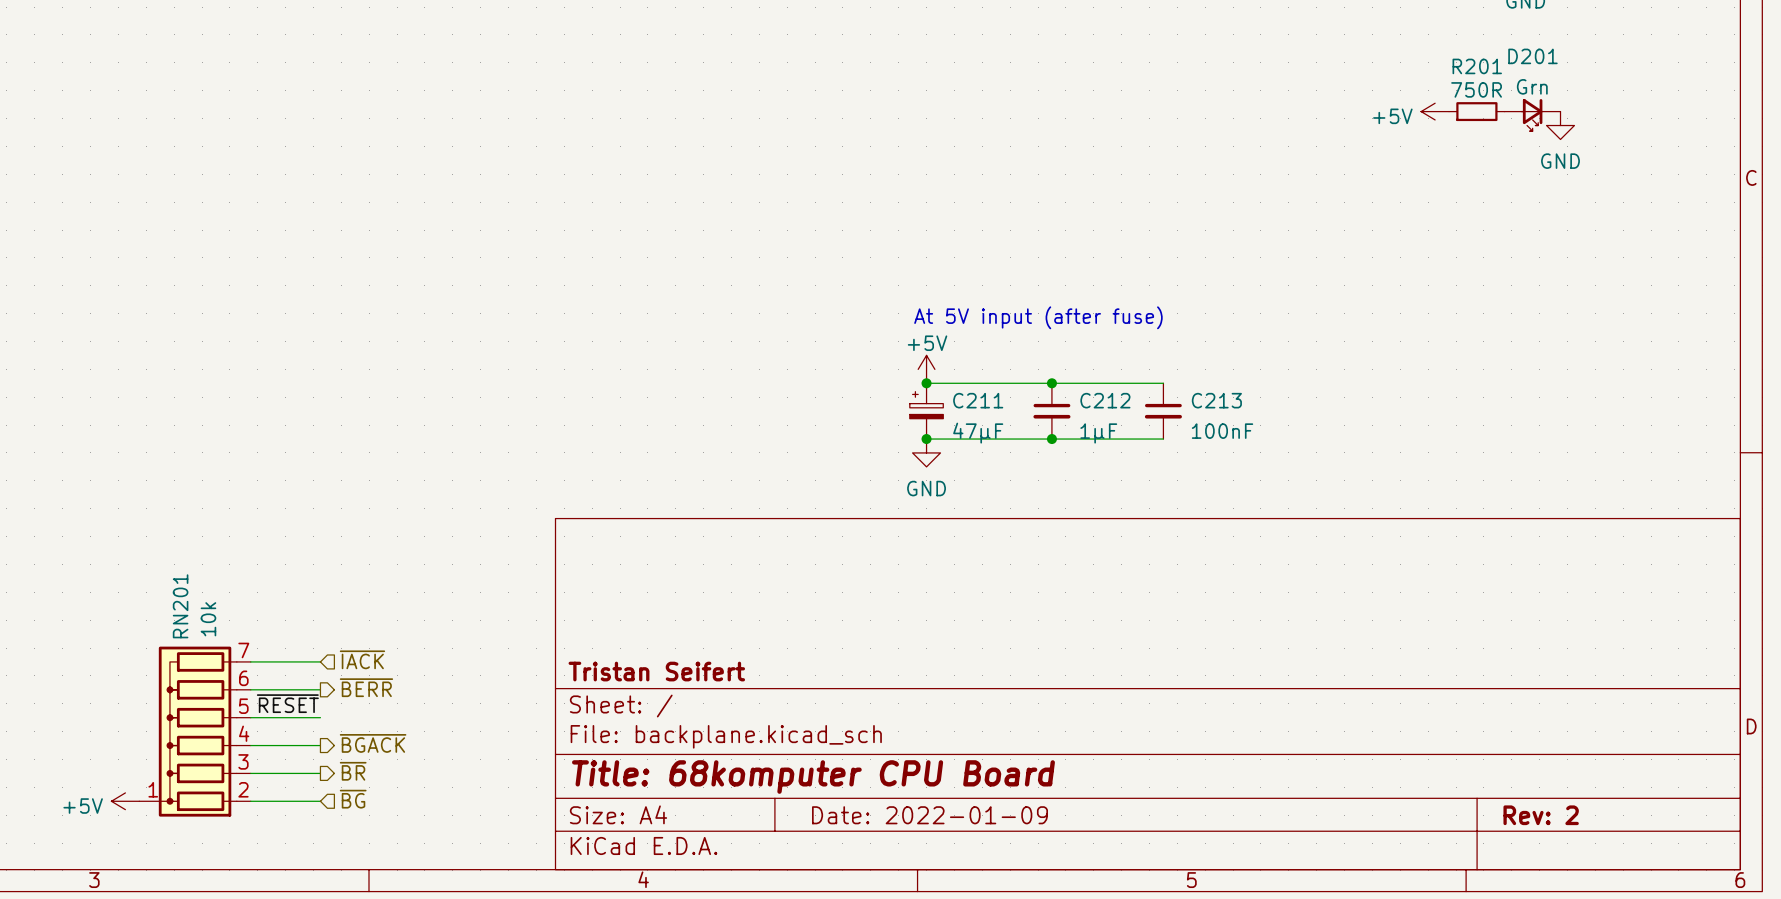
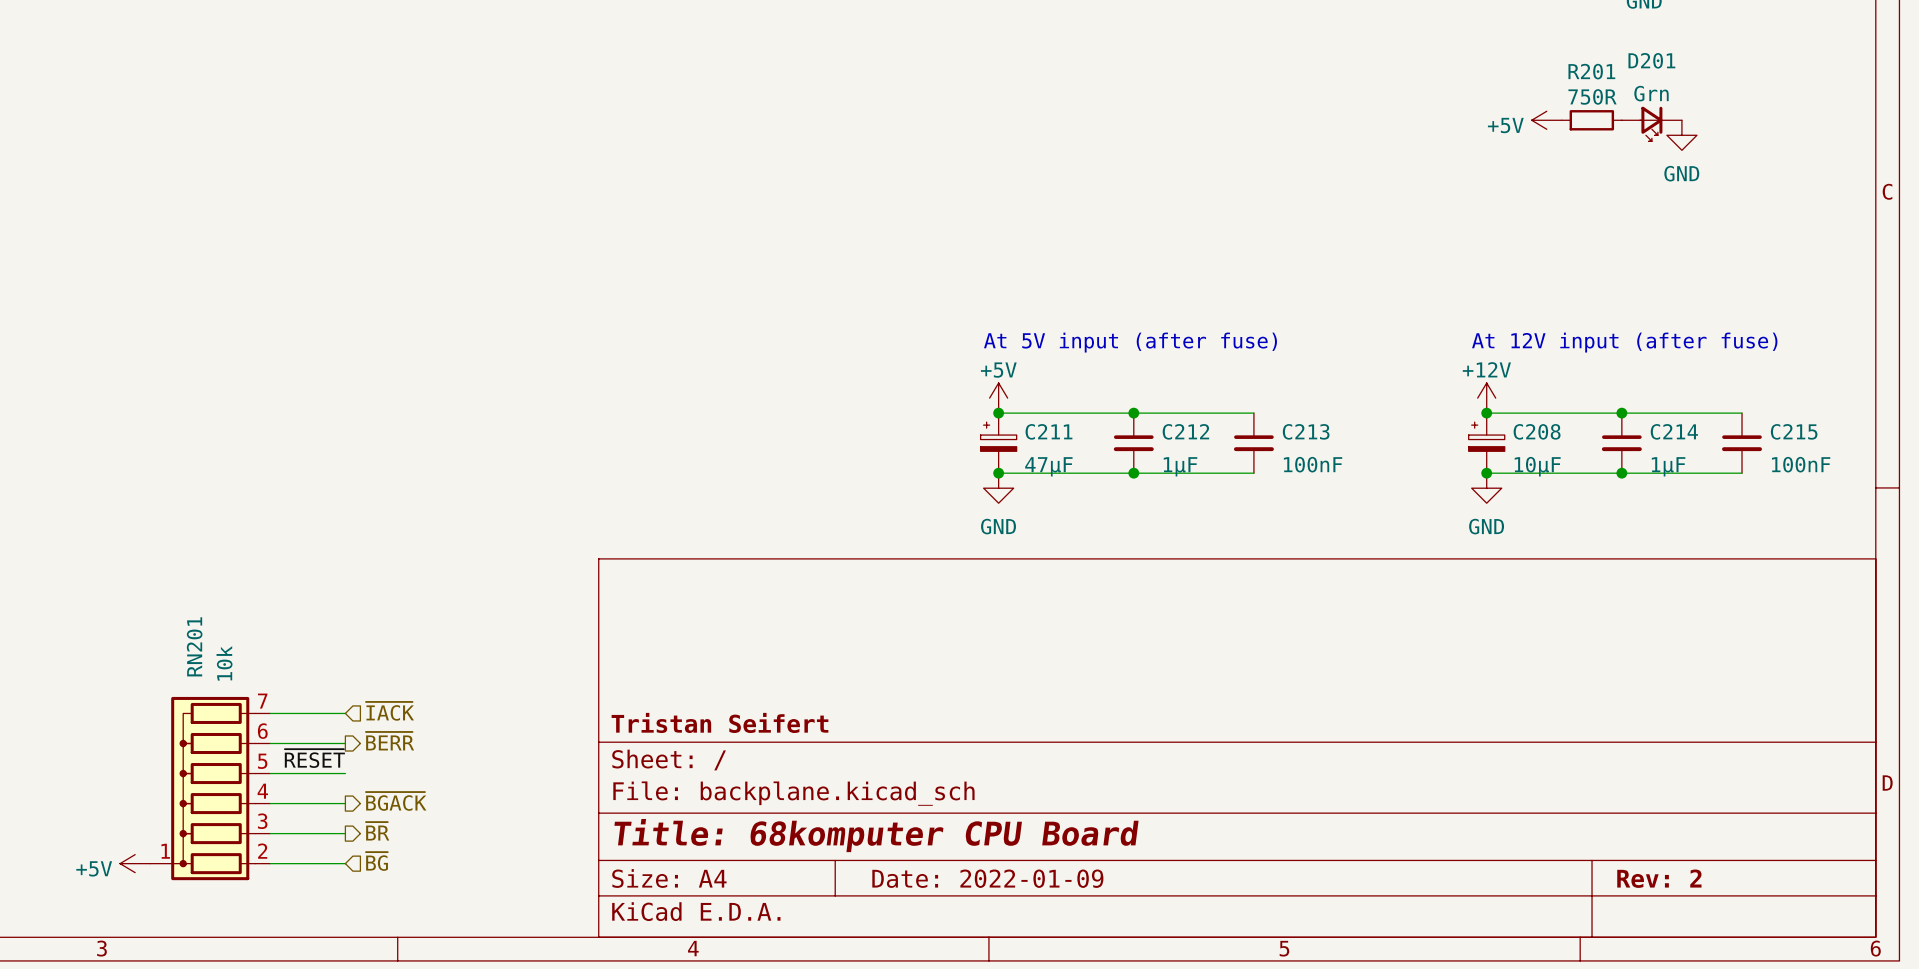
text: none -> At 12V input (after fuse) (1624, 342)
power symbol: none -> +12V (1486, 398)
wire: none -> (1486, 413) (1742, 413)
junction: none -> (1486, 413)
junction: none -> (1621, 413)
C208: none -> 10µF (1486, 443)
C214: none -> 1µF (1621, 443)
C215: none -> 100nF (1742, 443)
wire: none -> (1486, 473) (1742, 473)
junction: none -> (1486, 473)
junction: none -> (1621, 473)
power symbol: none -> GND (1486, 488)

